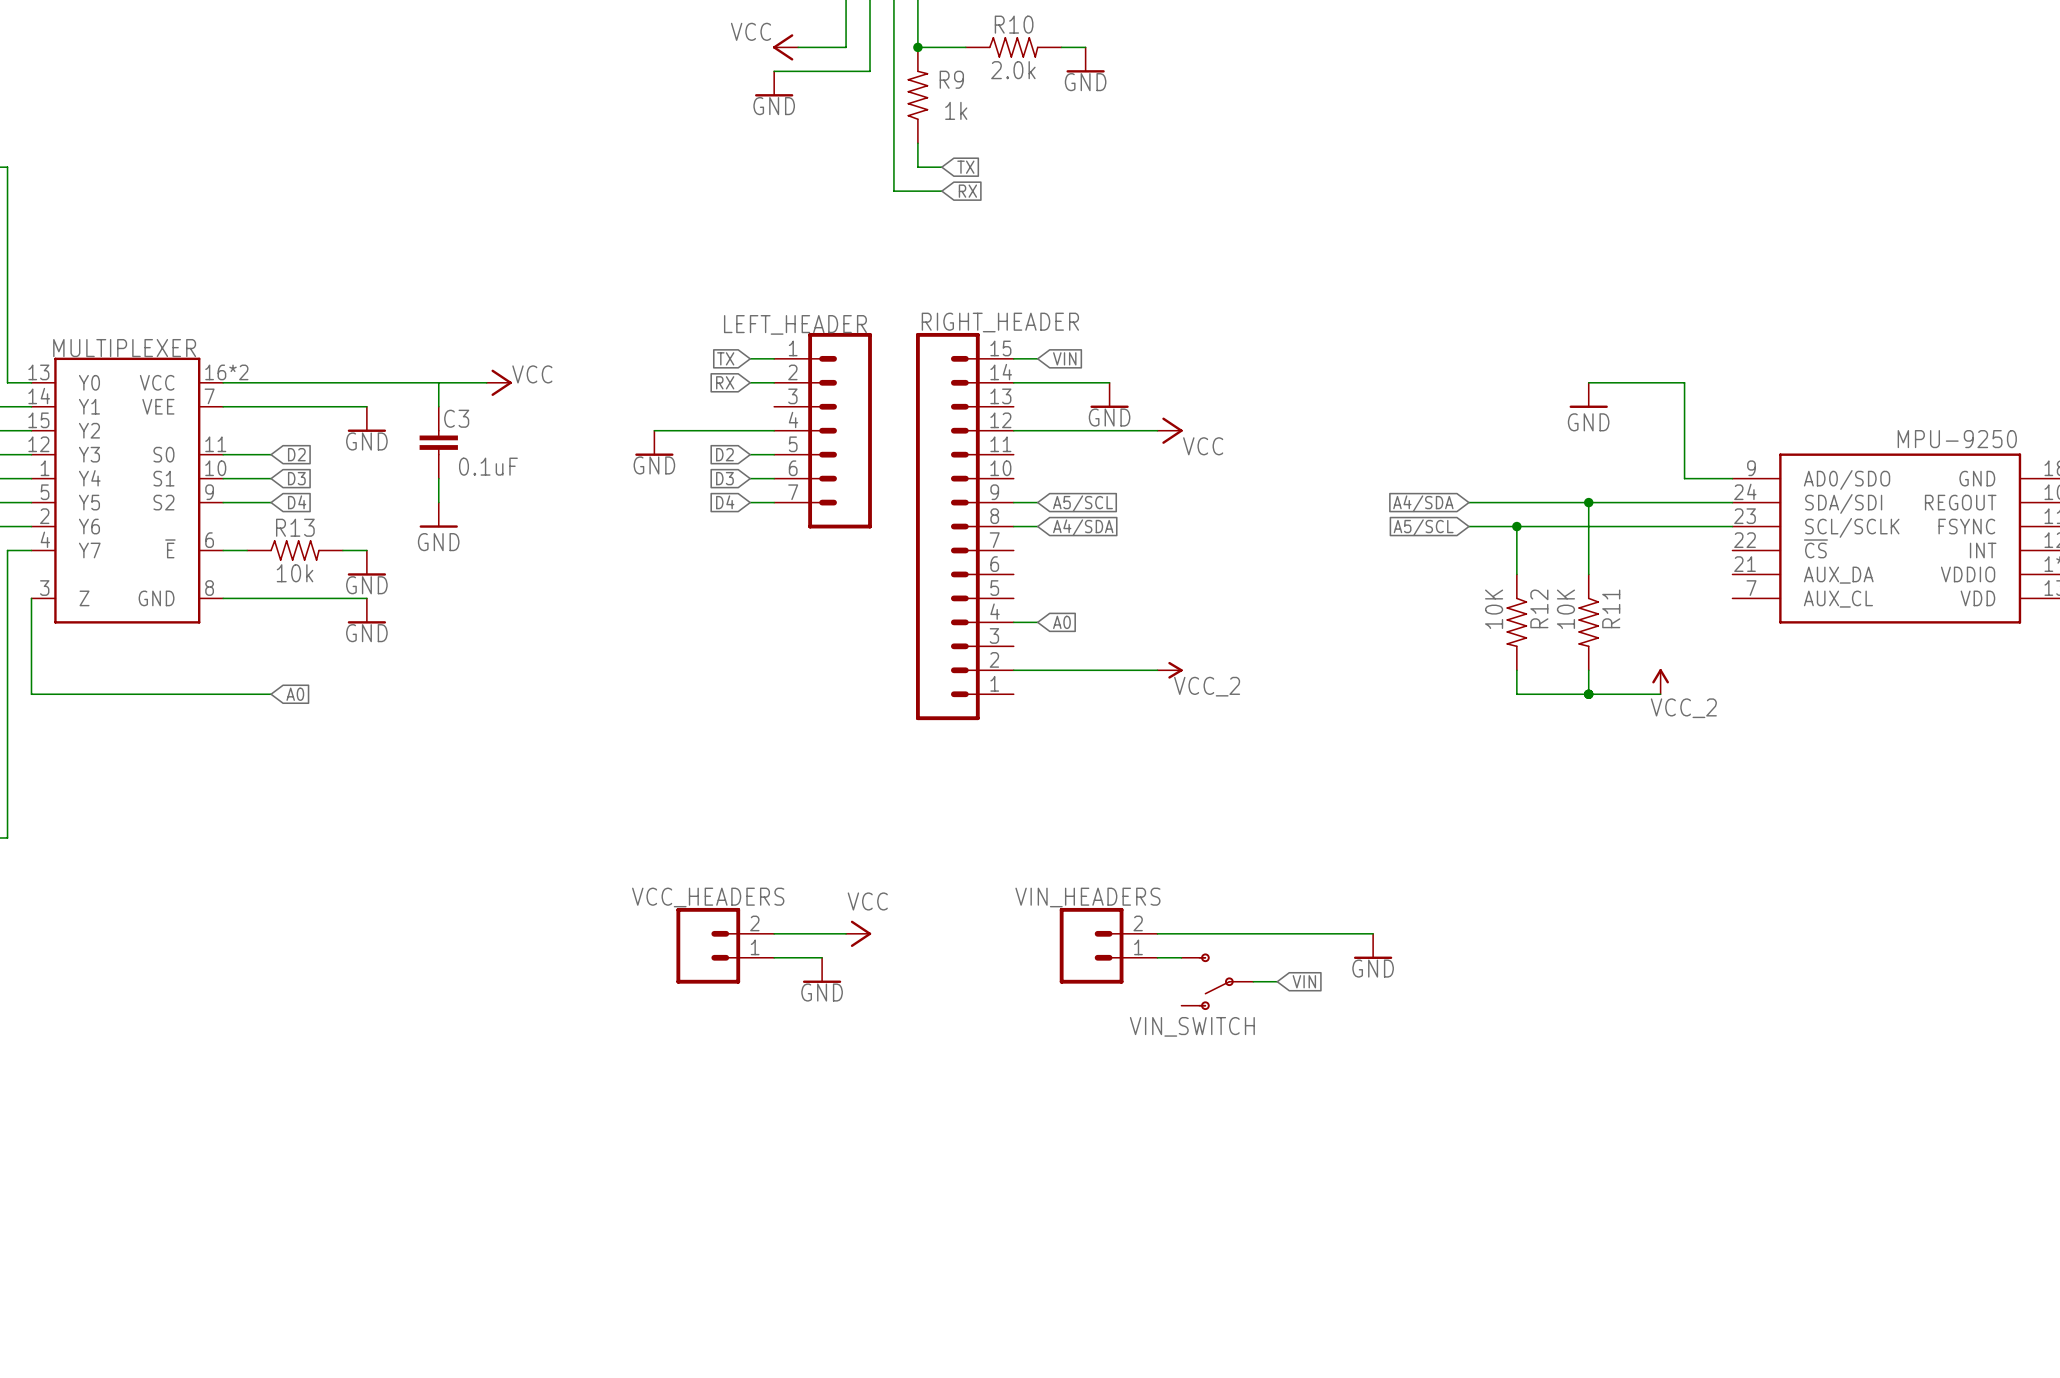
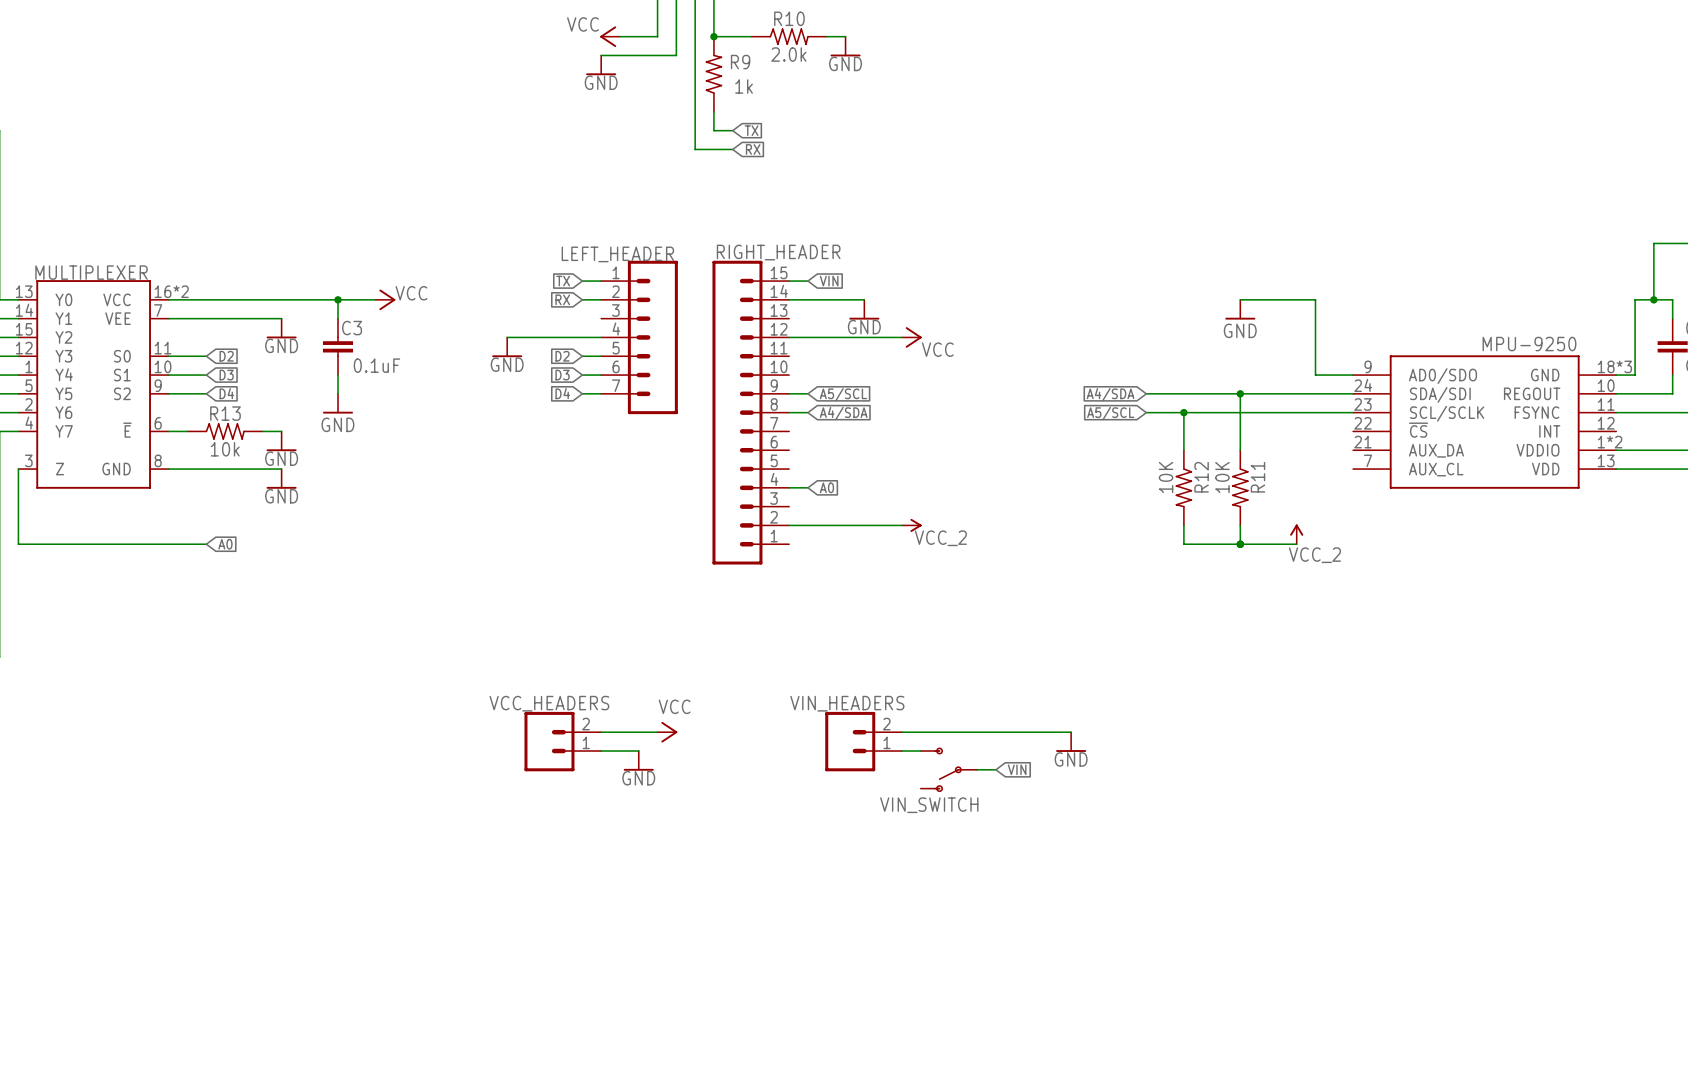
junction: none -> (338, 299)

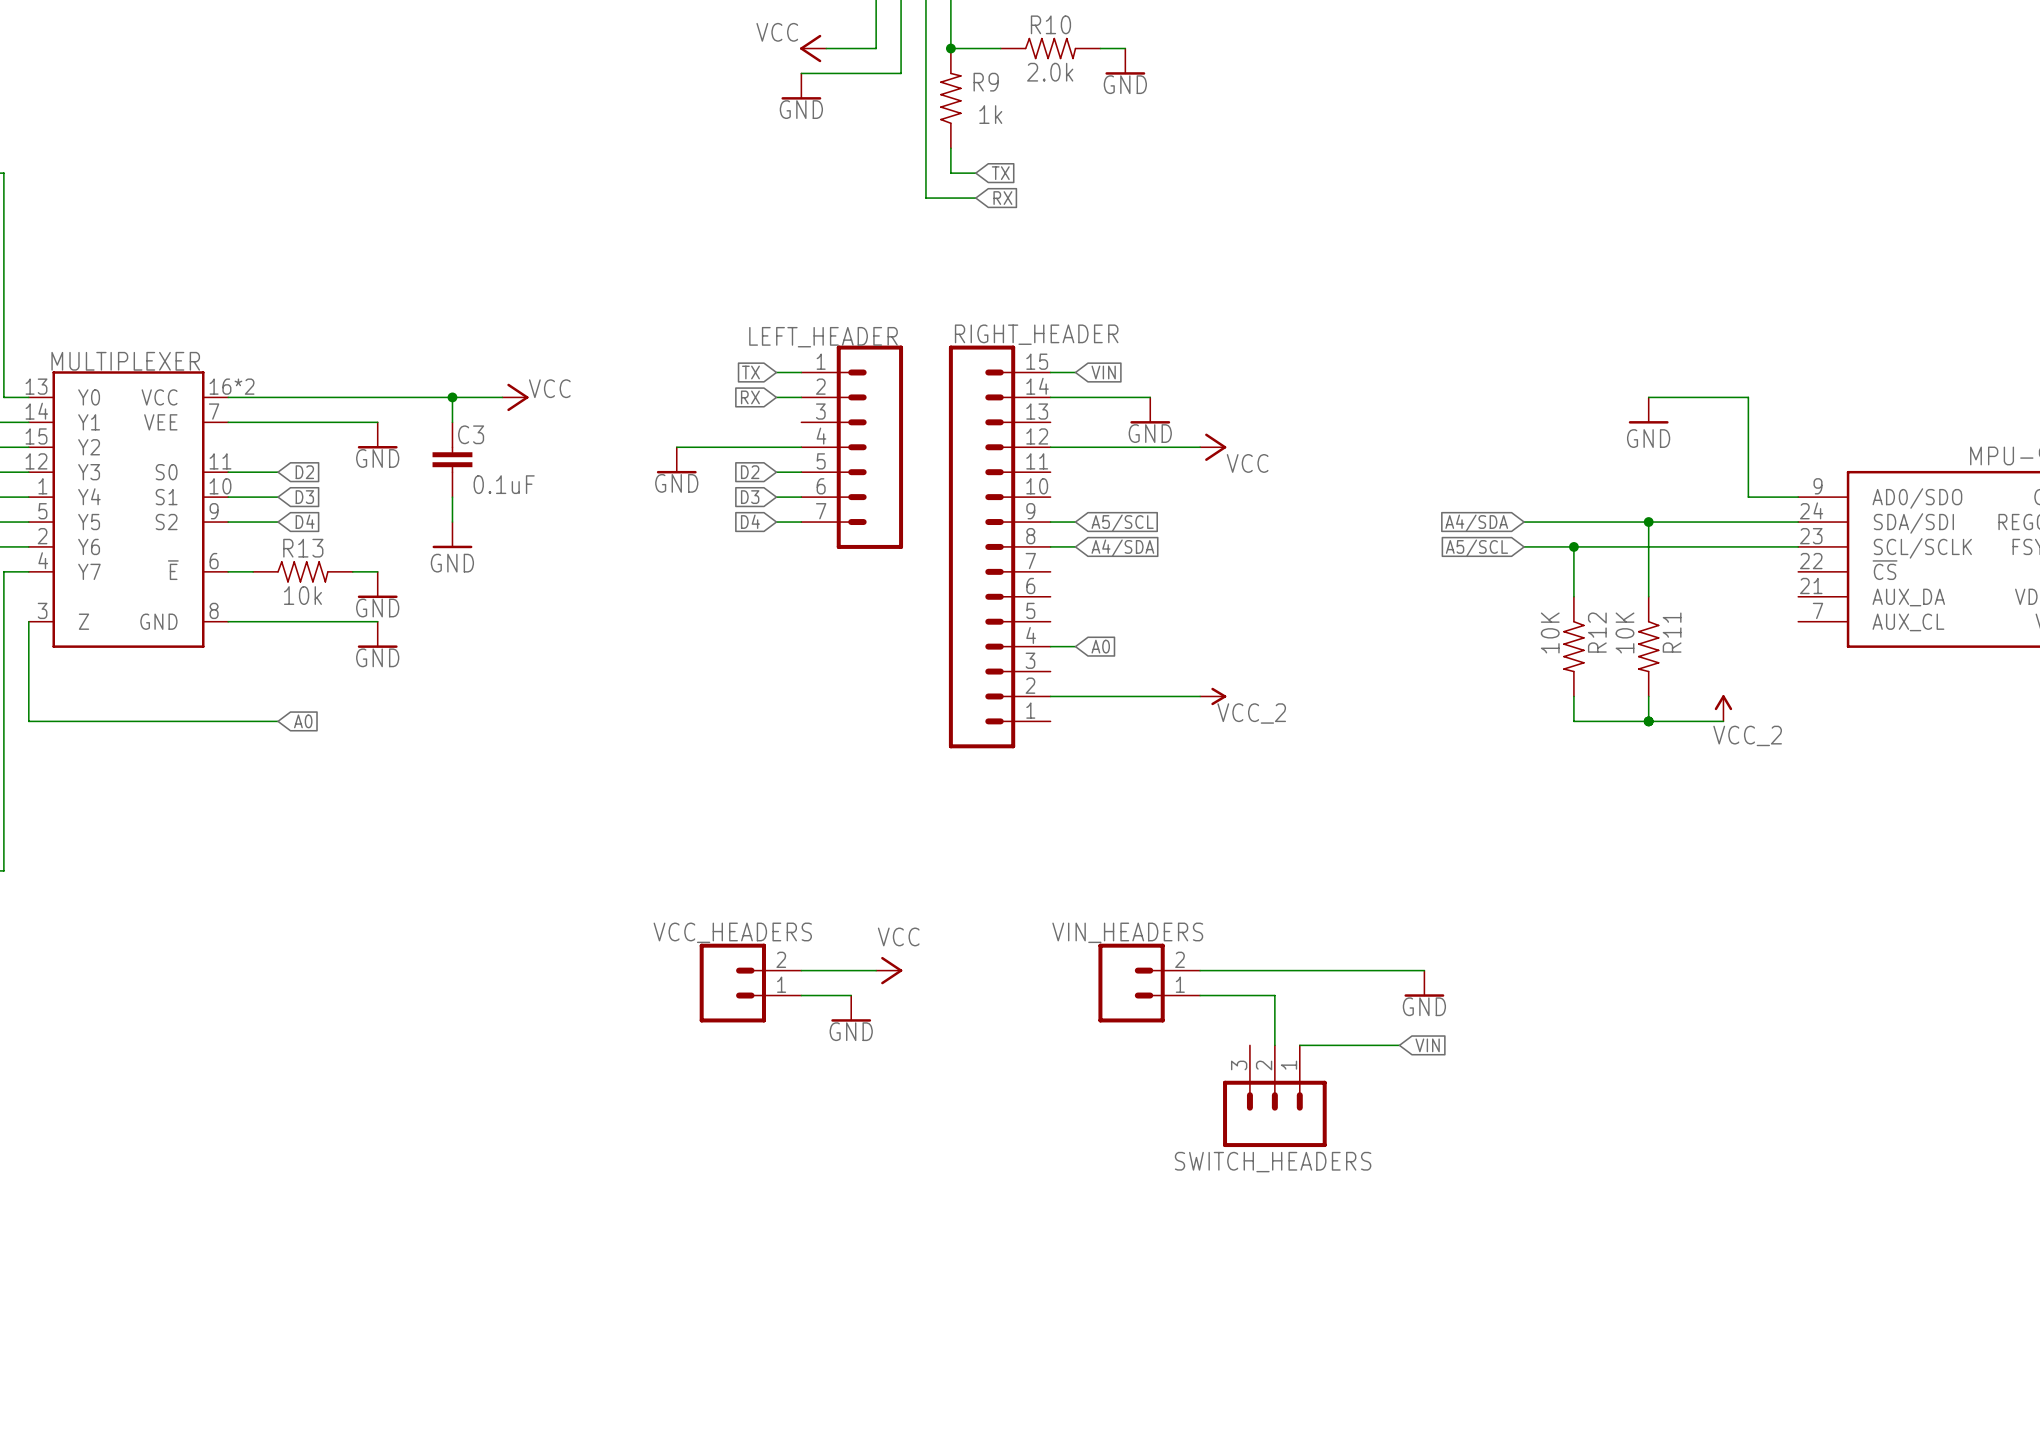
wire: none -> (1225, 995) (1274, 995) (1274, 1045)
VIN_SWITCH: (948, 769) -> none
wire: (977, 769) (995, 769) -> none
global label position: VIN (1017, 769) -> VIN (1427, 1045)
wire: none -> (1299, 1045) (1399, 1045)
SWITCH_HEADERS: none -> (1274, 1096)

